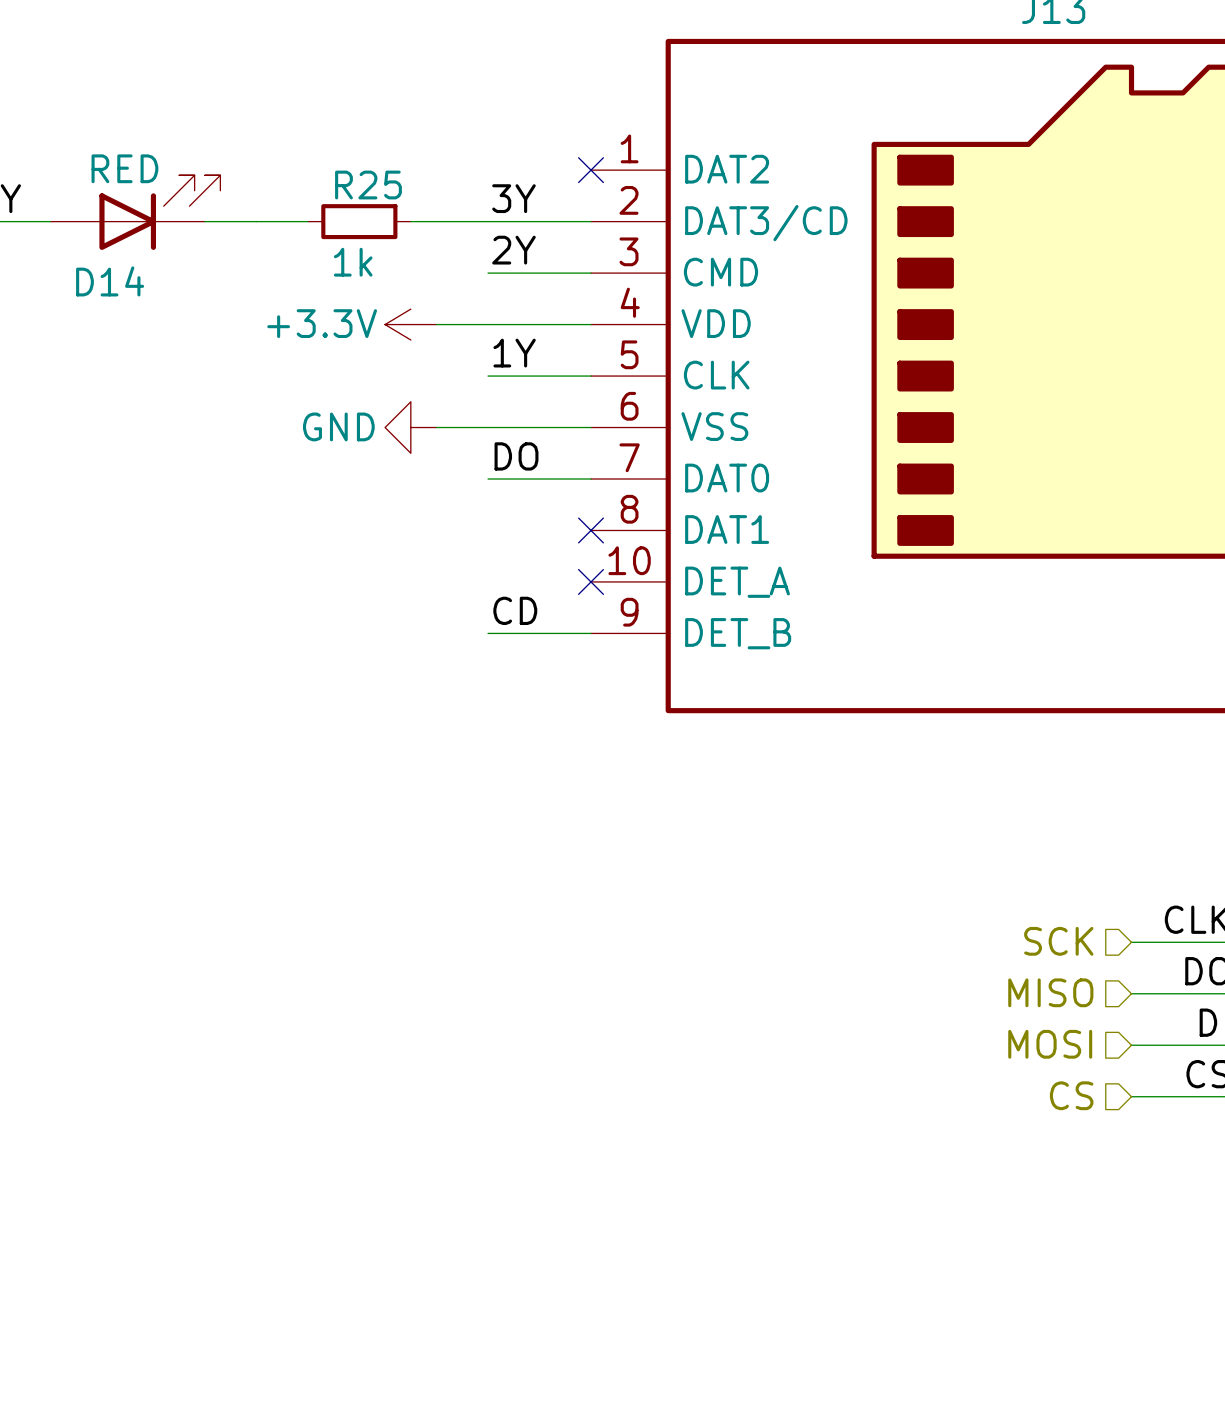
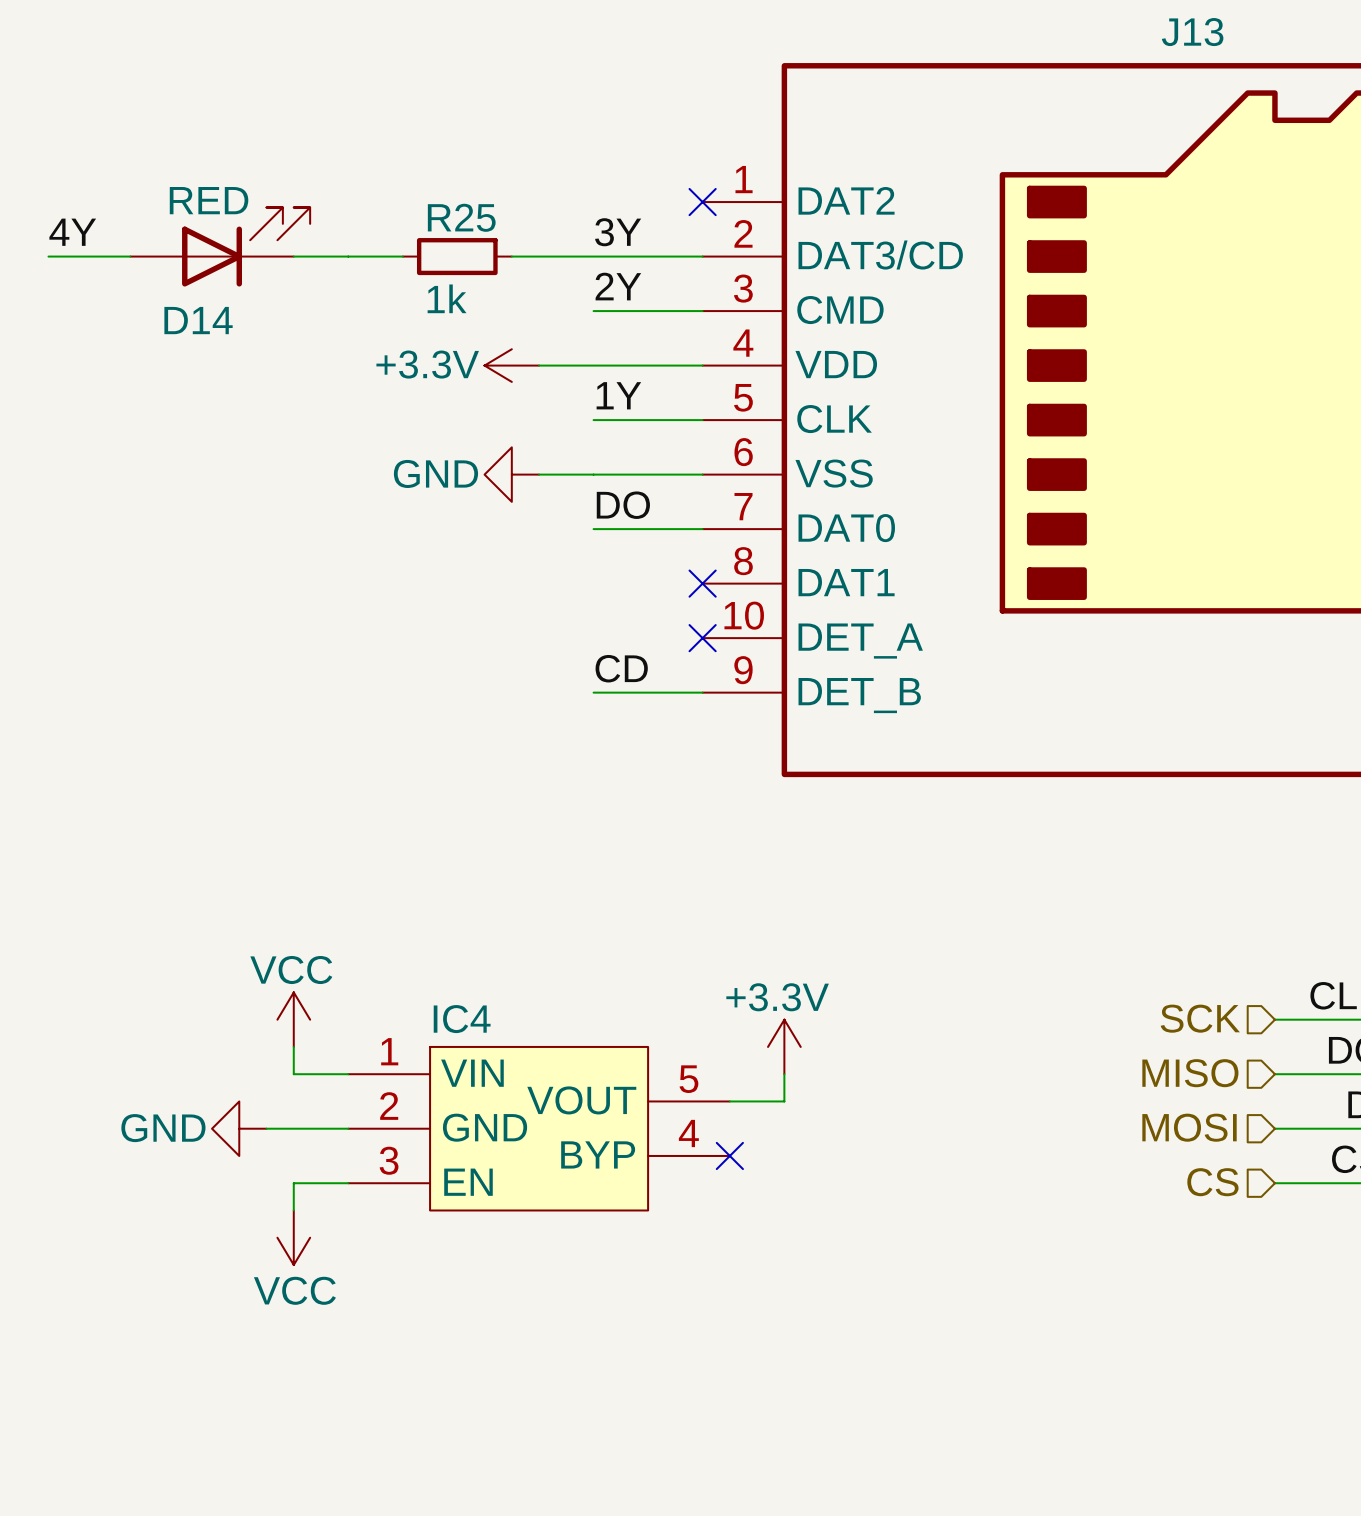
power symbol: none -> VCC (293, 1019)
wire: none -> (293, 1046) (293, 1074) (348, 1074)
power symbol: none -> +3.3V (784, 1046)
wire: none -> (784, 1074) (784, 1101) (729, 1101)
power symbol: none -> GND (239, 1128)
wire: none -> (266, 1128) (348, 1128)
IC4: none -> (539, 1128)
no-connect mark: none -> (729, 1155)
wire: none -> (348, 1183) (293, 1183) (293, 1210)
power symbol: none -> VCC (293, 1237)

